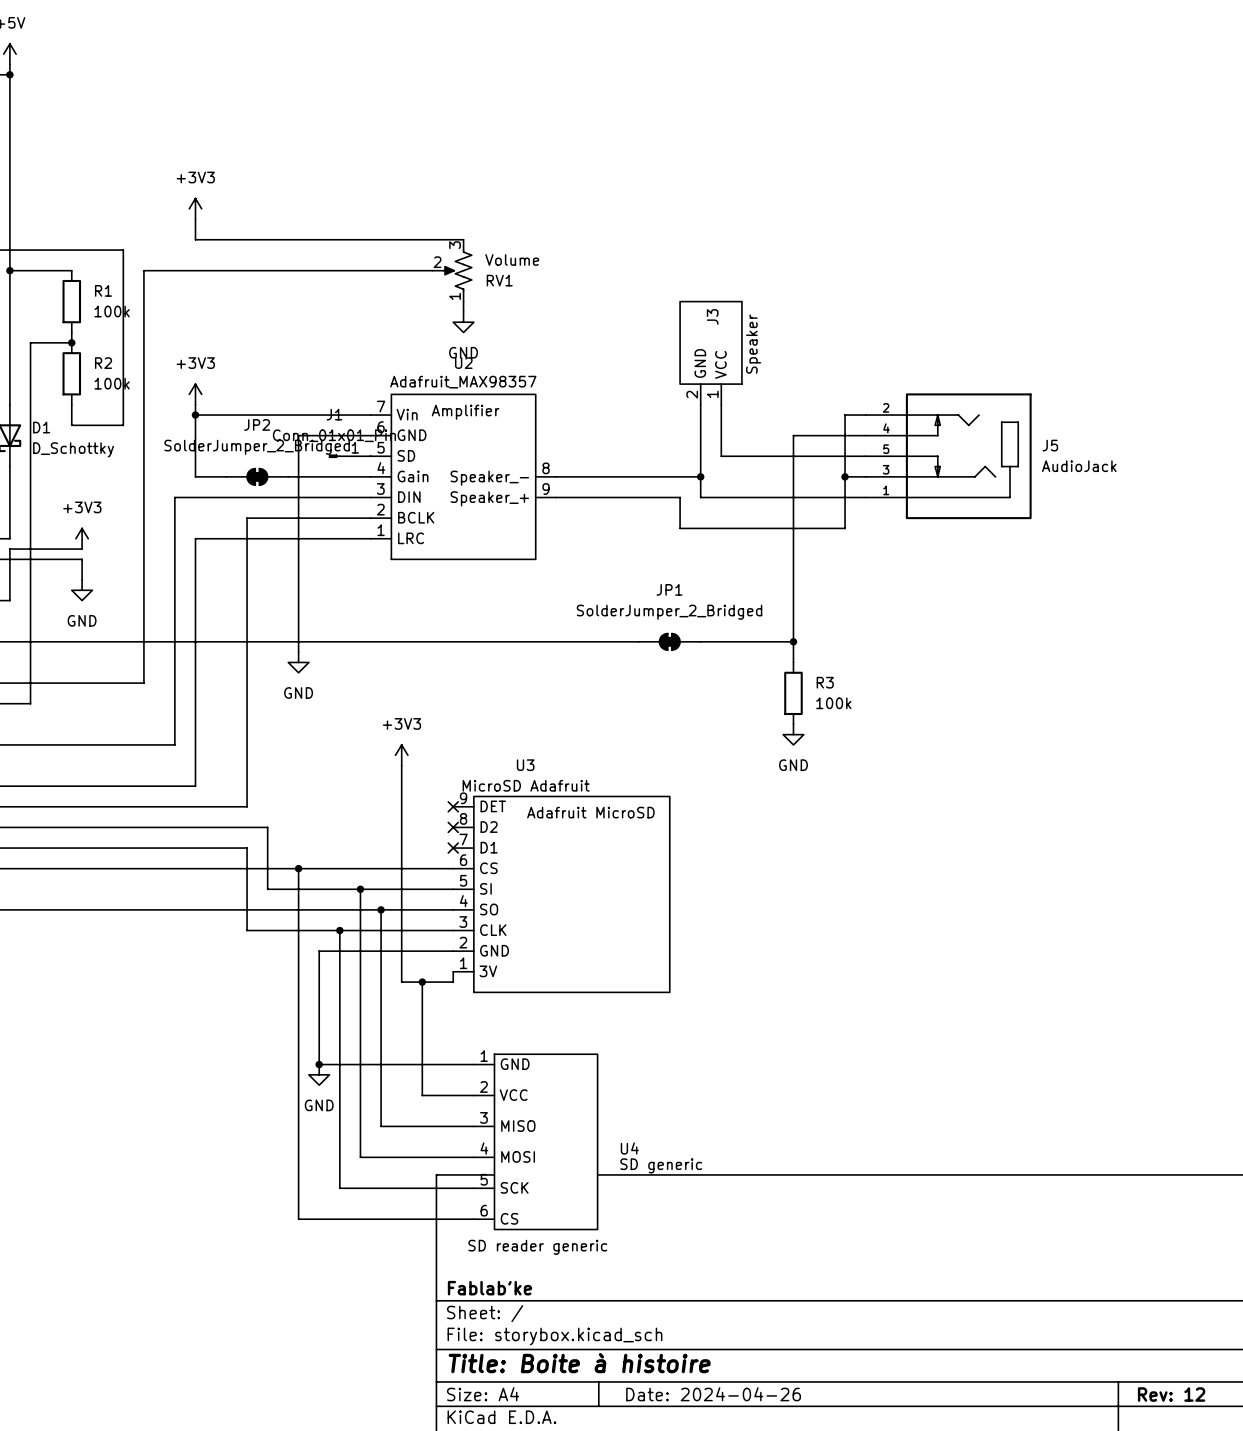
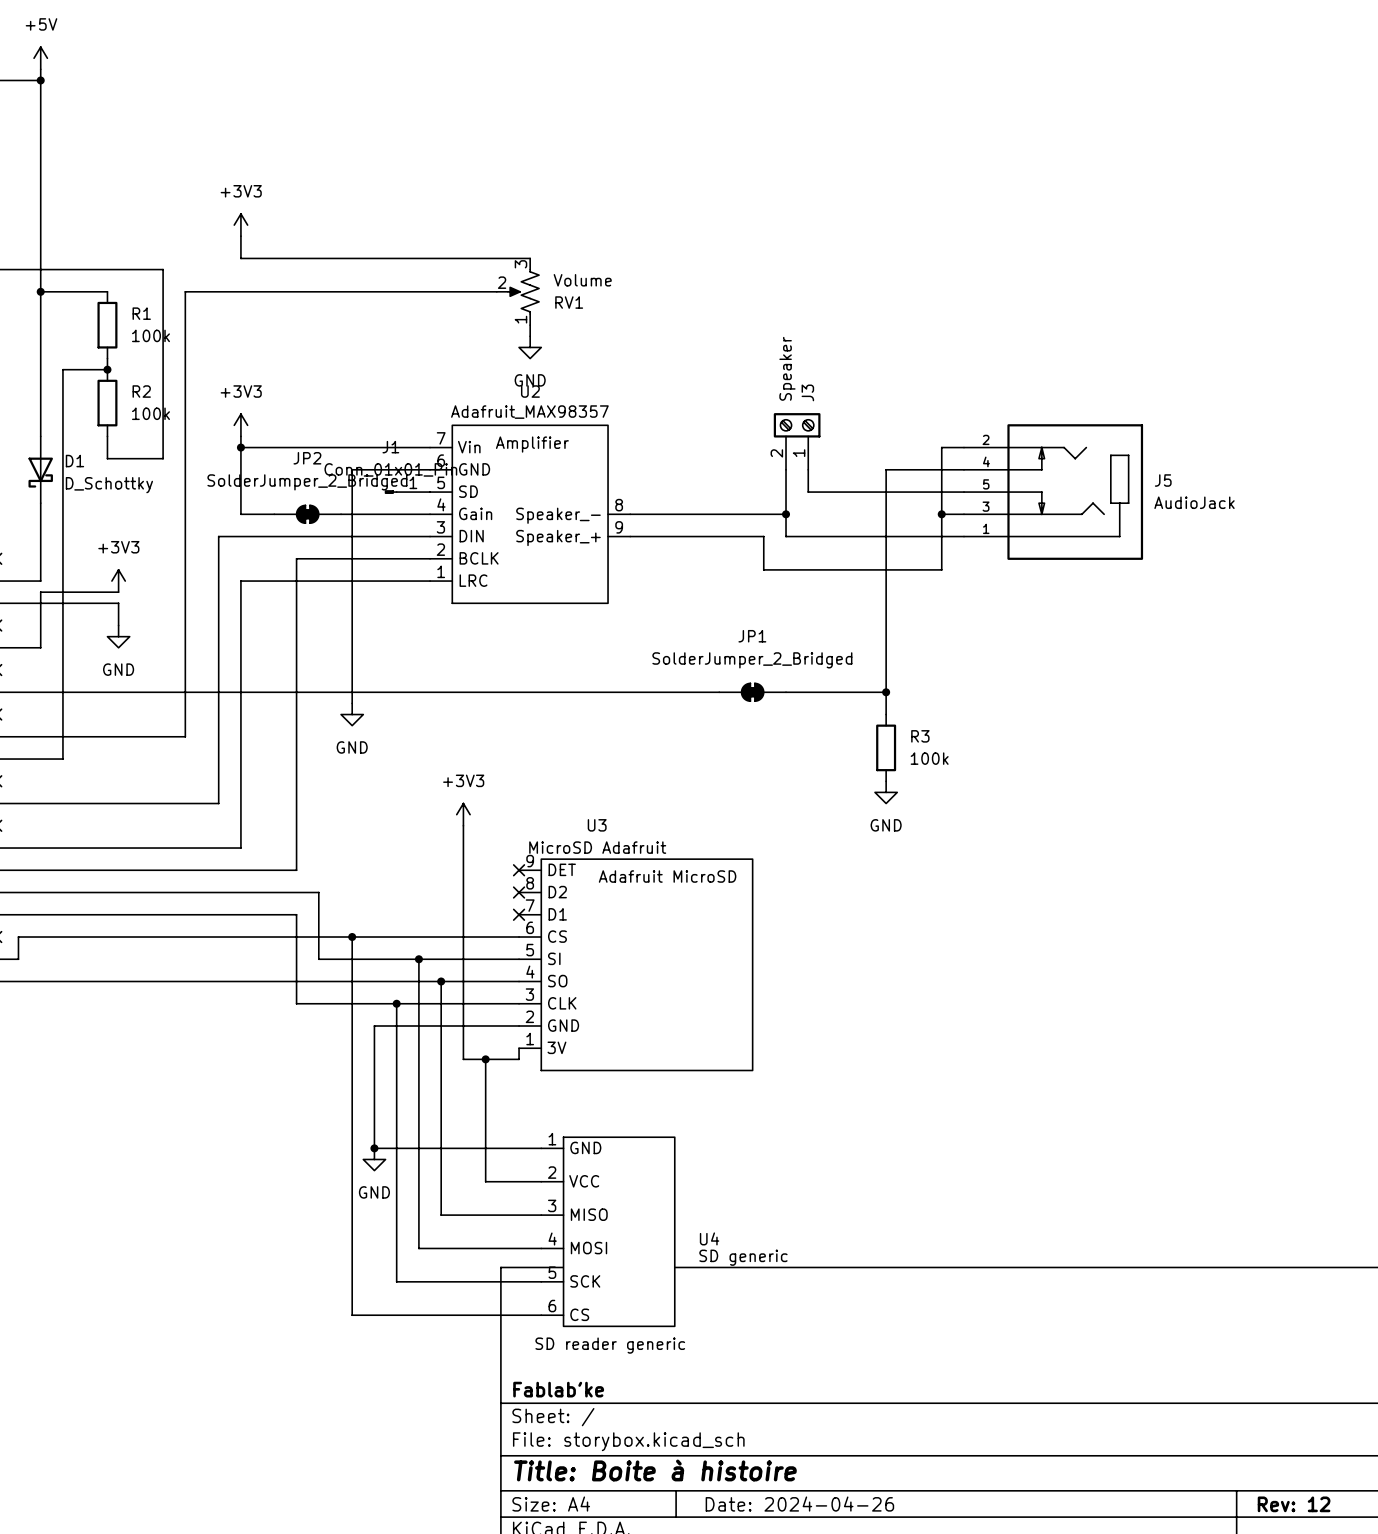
J3 symbol: [680, 301, 742, 405] -> [773, 413, 821, 470]
J3 value position: Speaker (753, 344) -> Speaker (787, 368)

